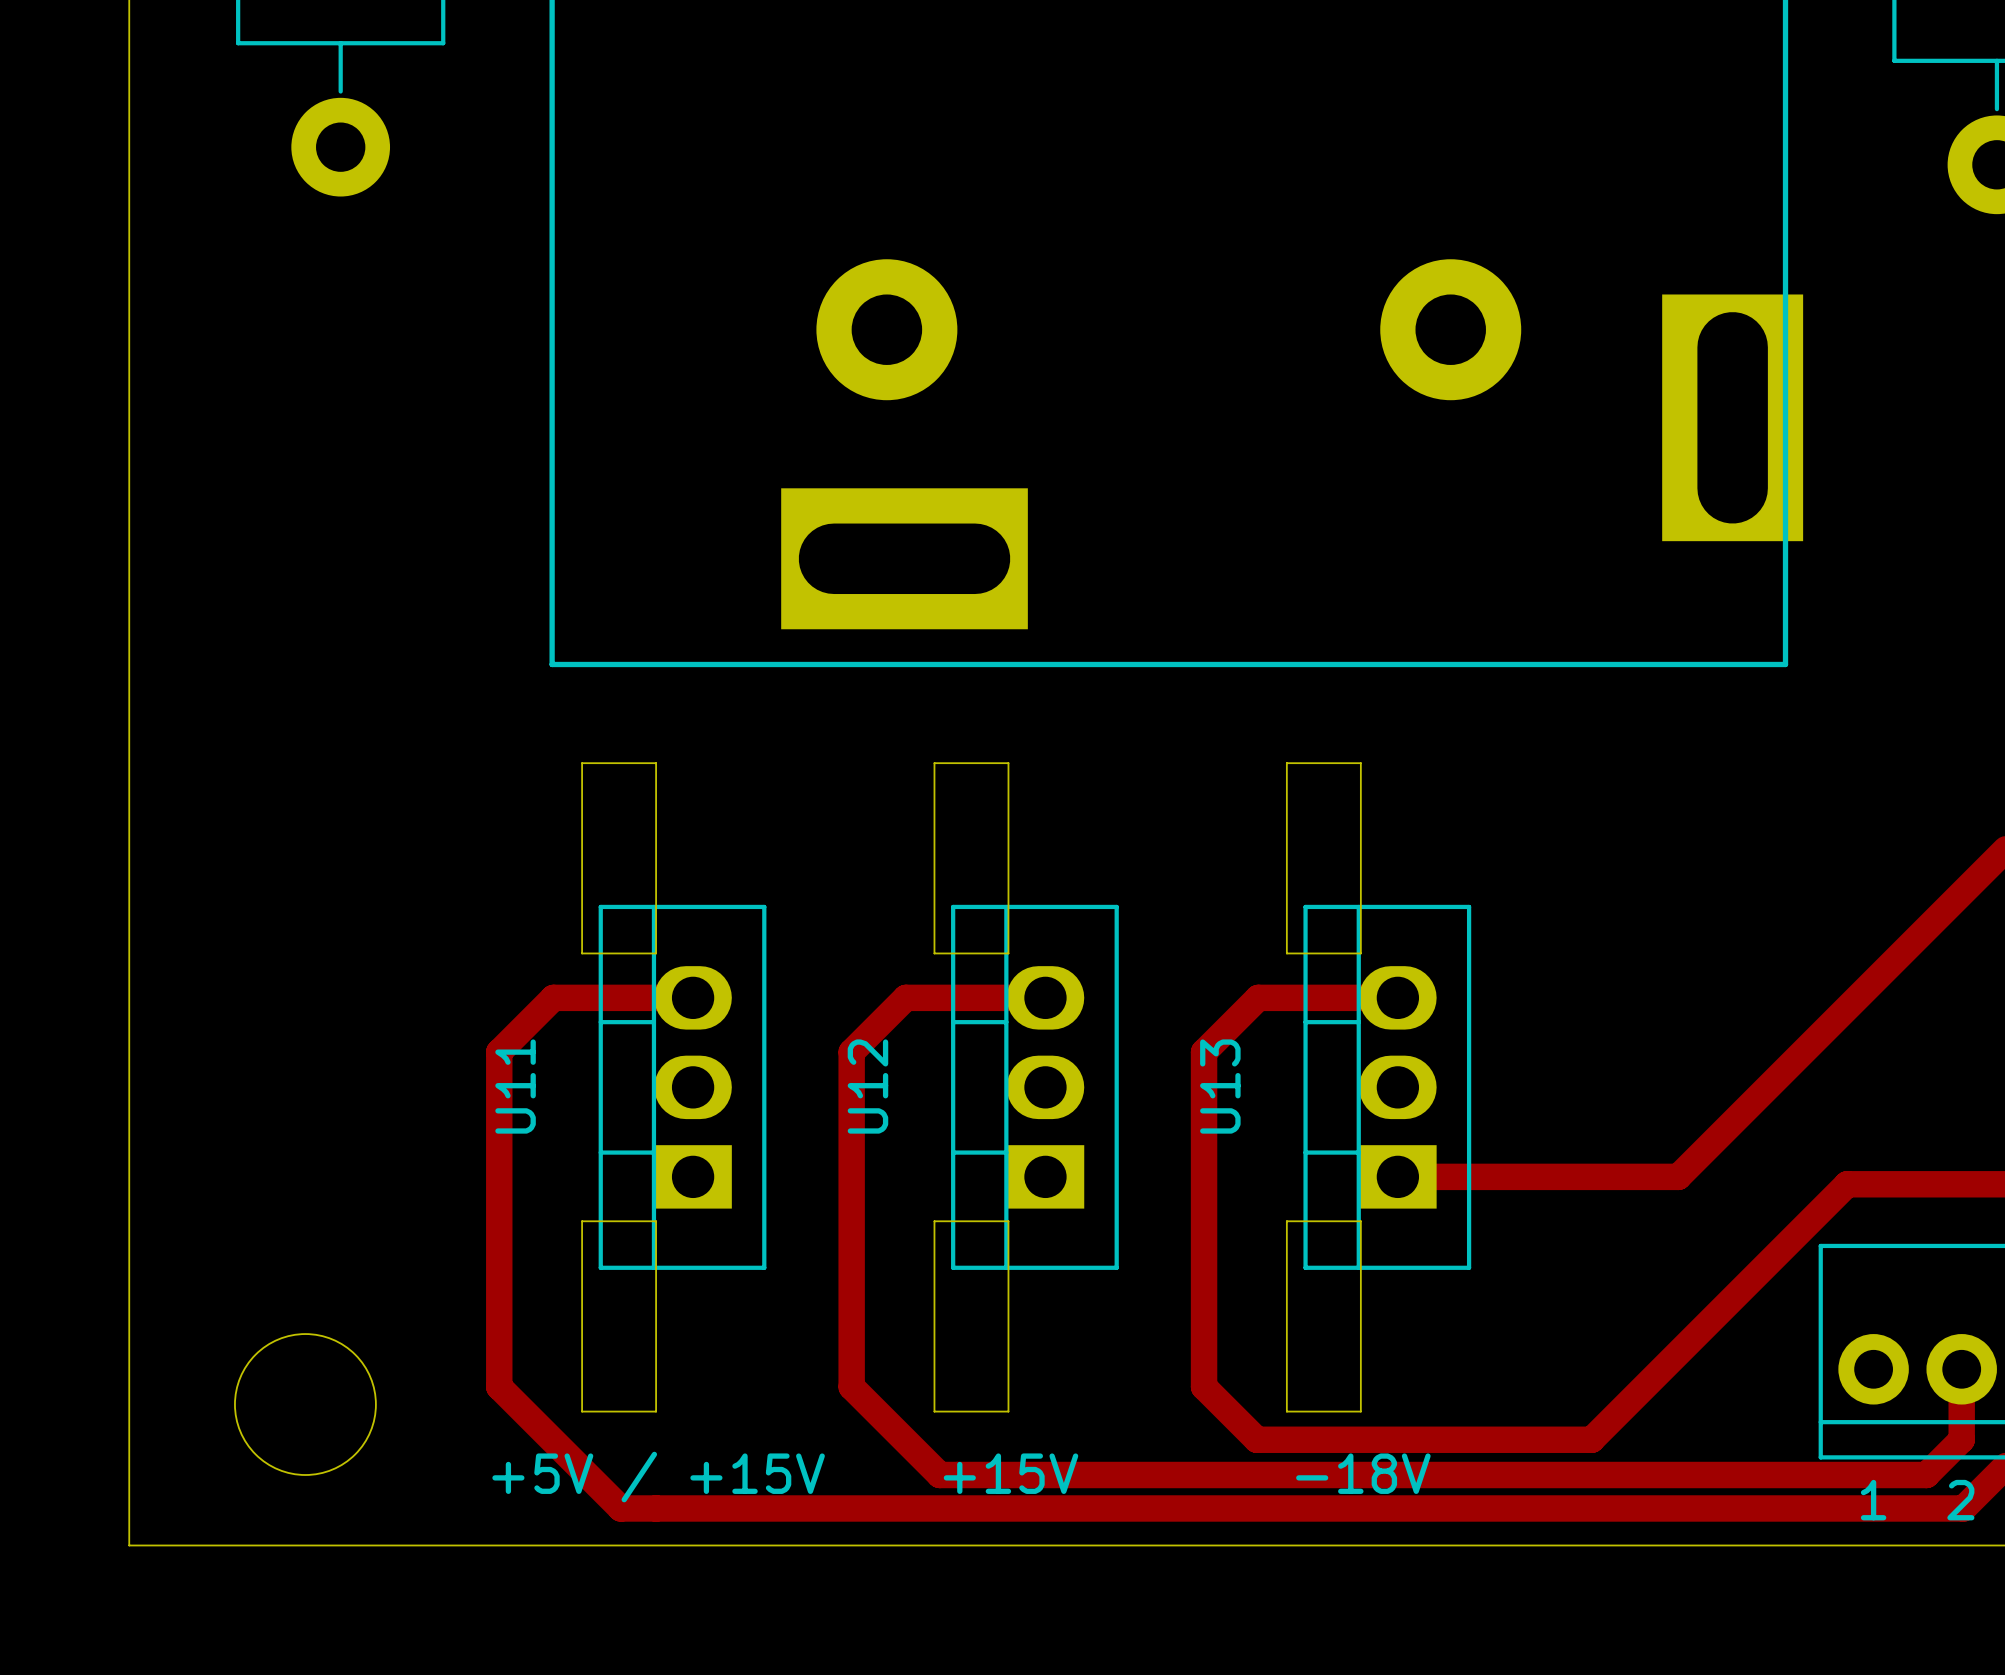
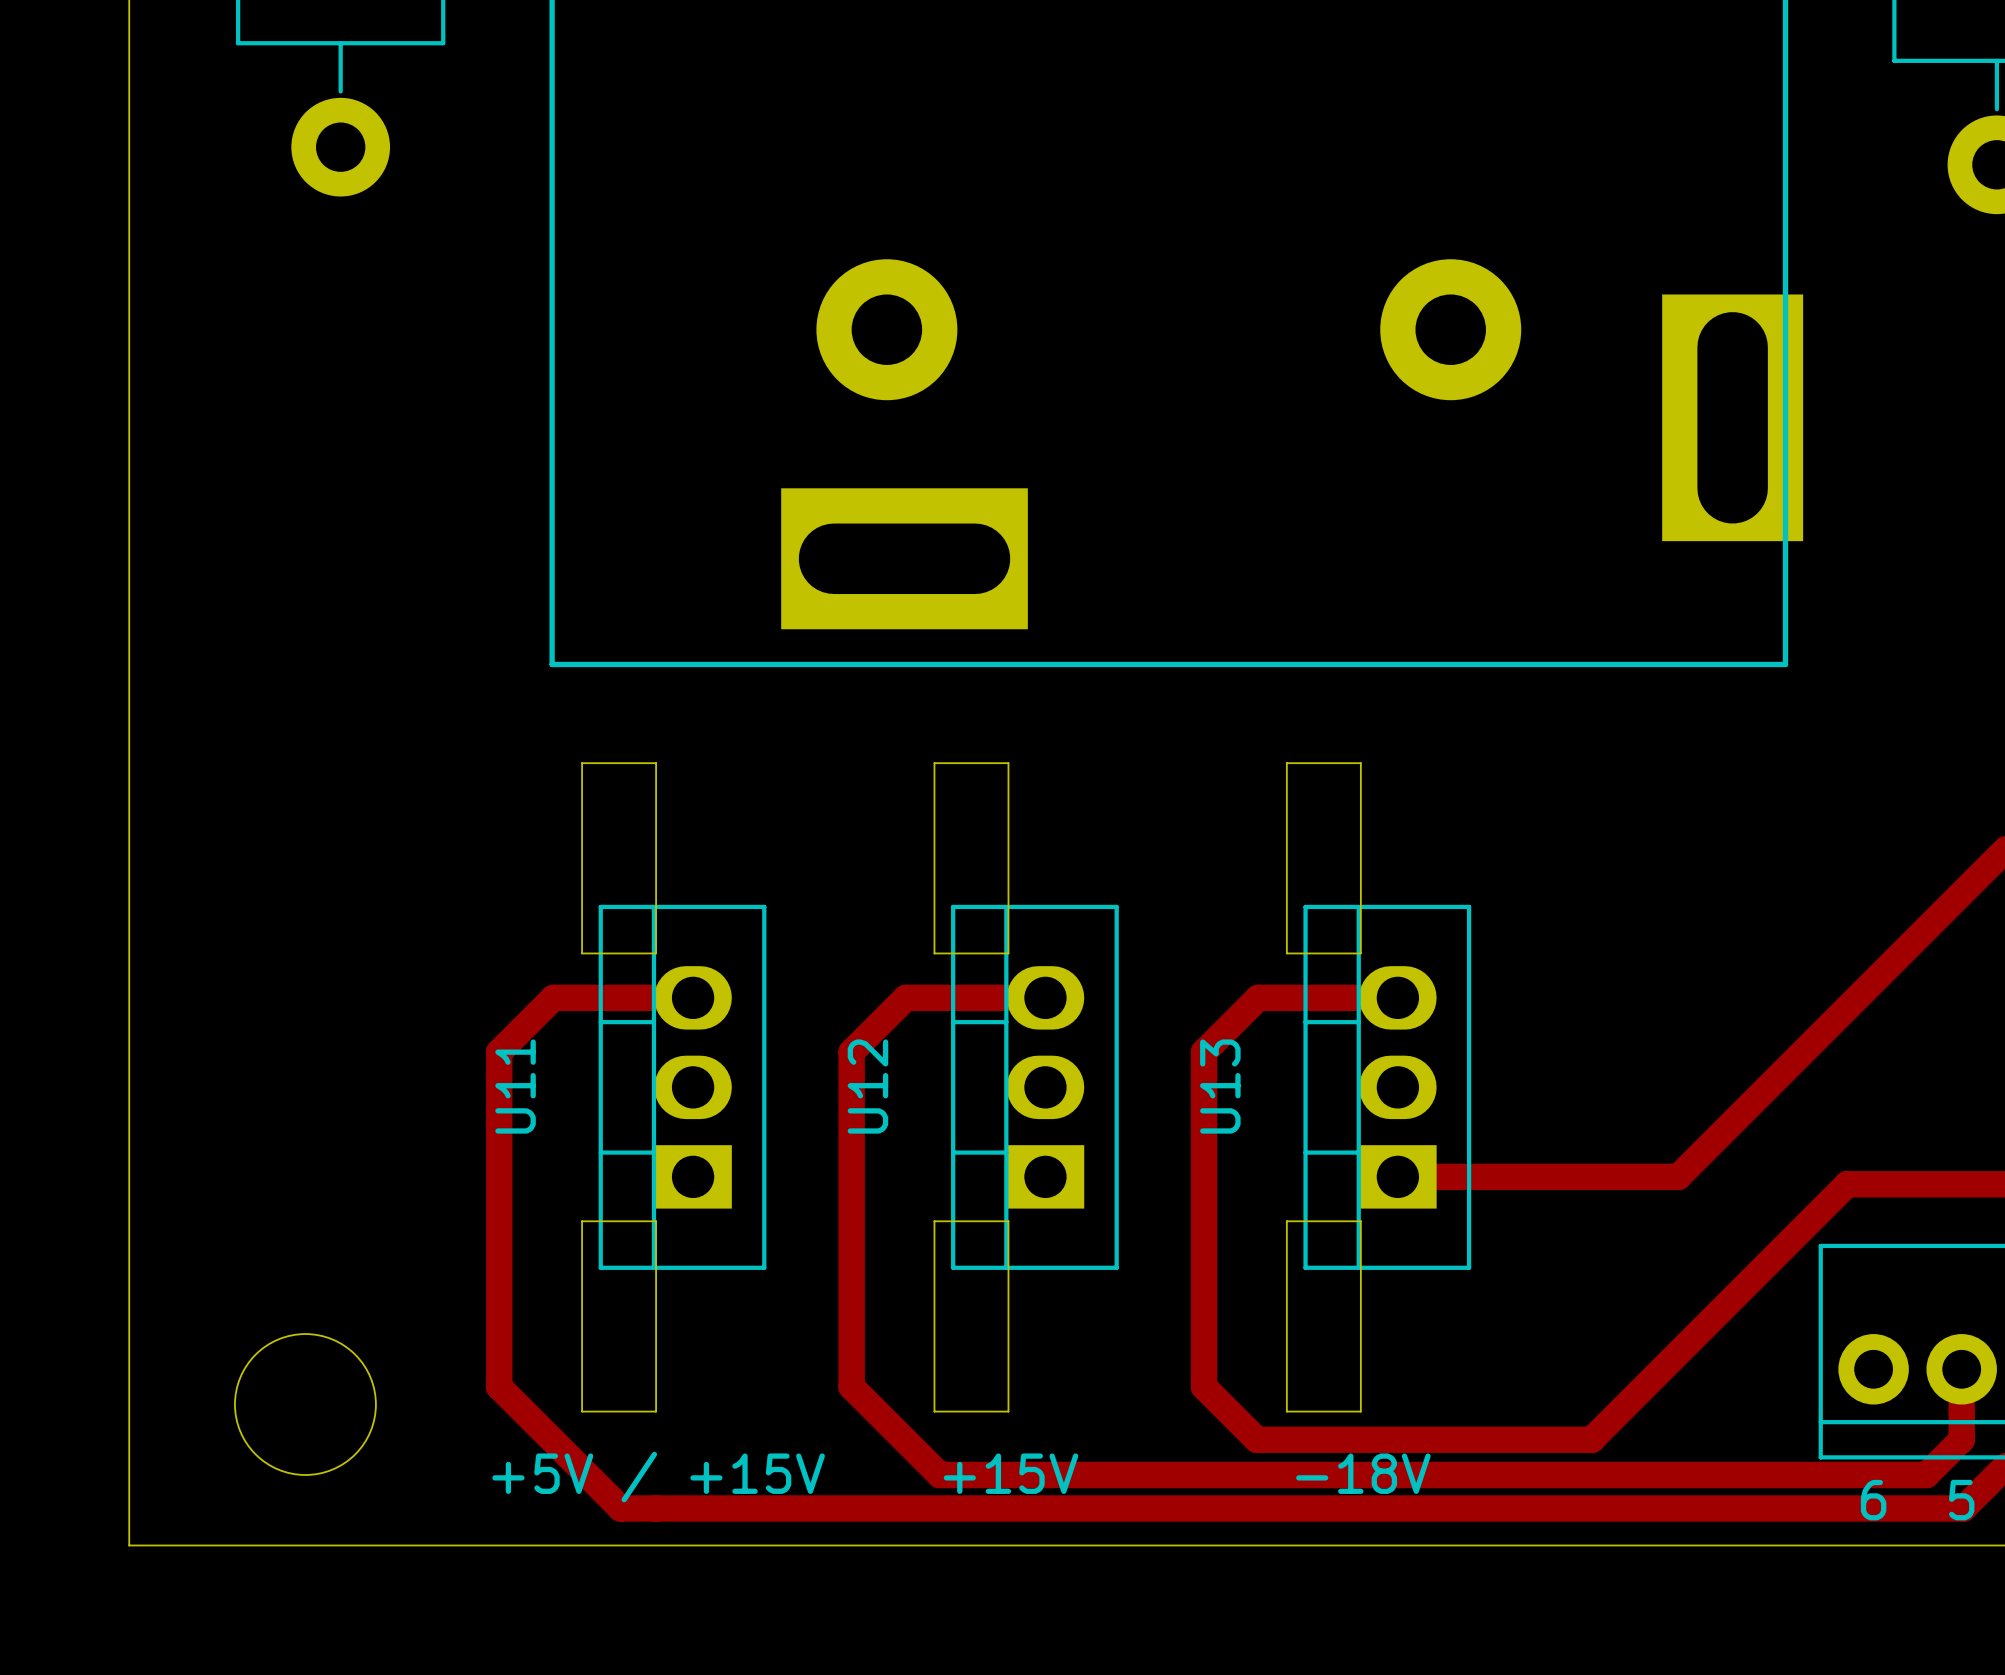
text: 1 (1873, 1500) -> 6 (1873, 1500)
text: 2 (1960, 1500) -> 5 (1961, 1500)

